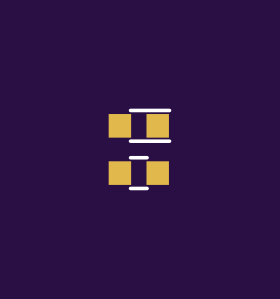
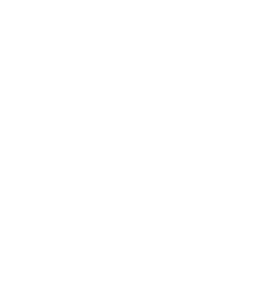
part: (140, 125) -> none
part: (138, 173) -> none

